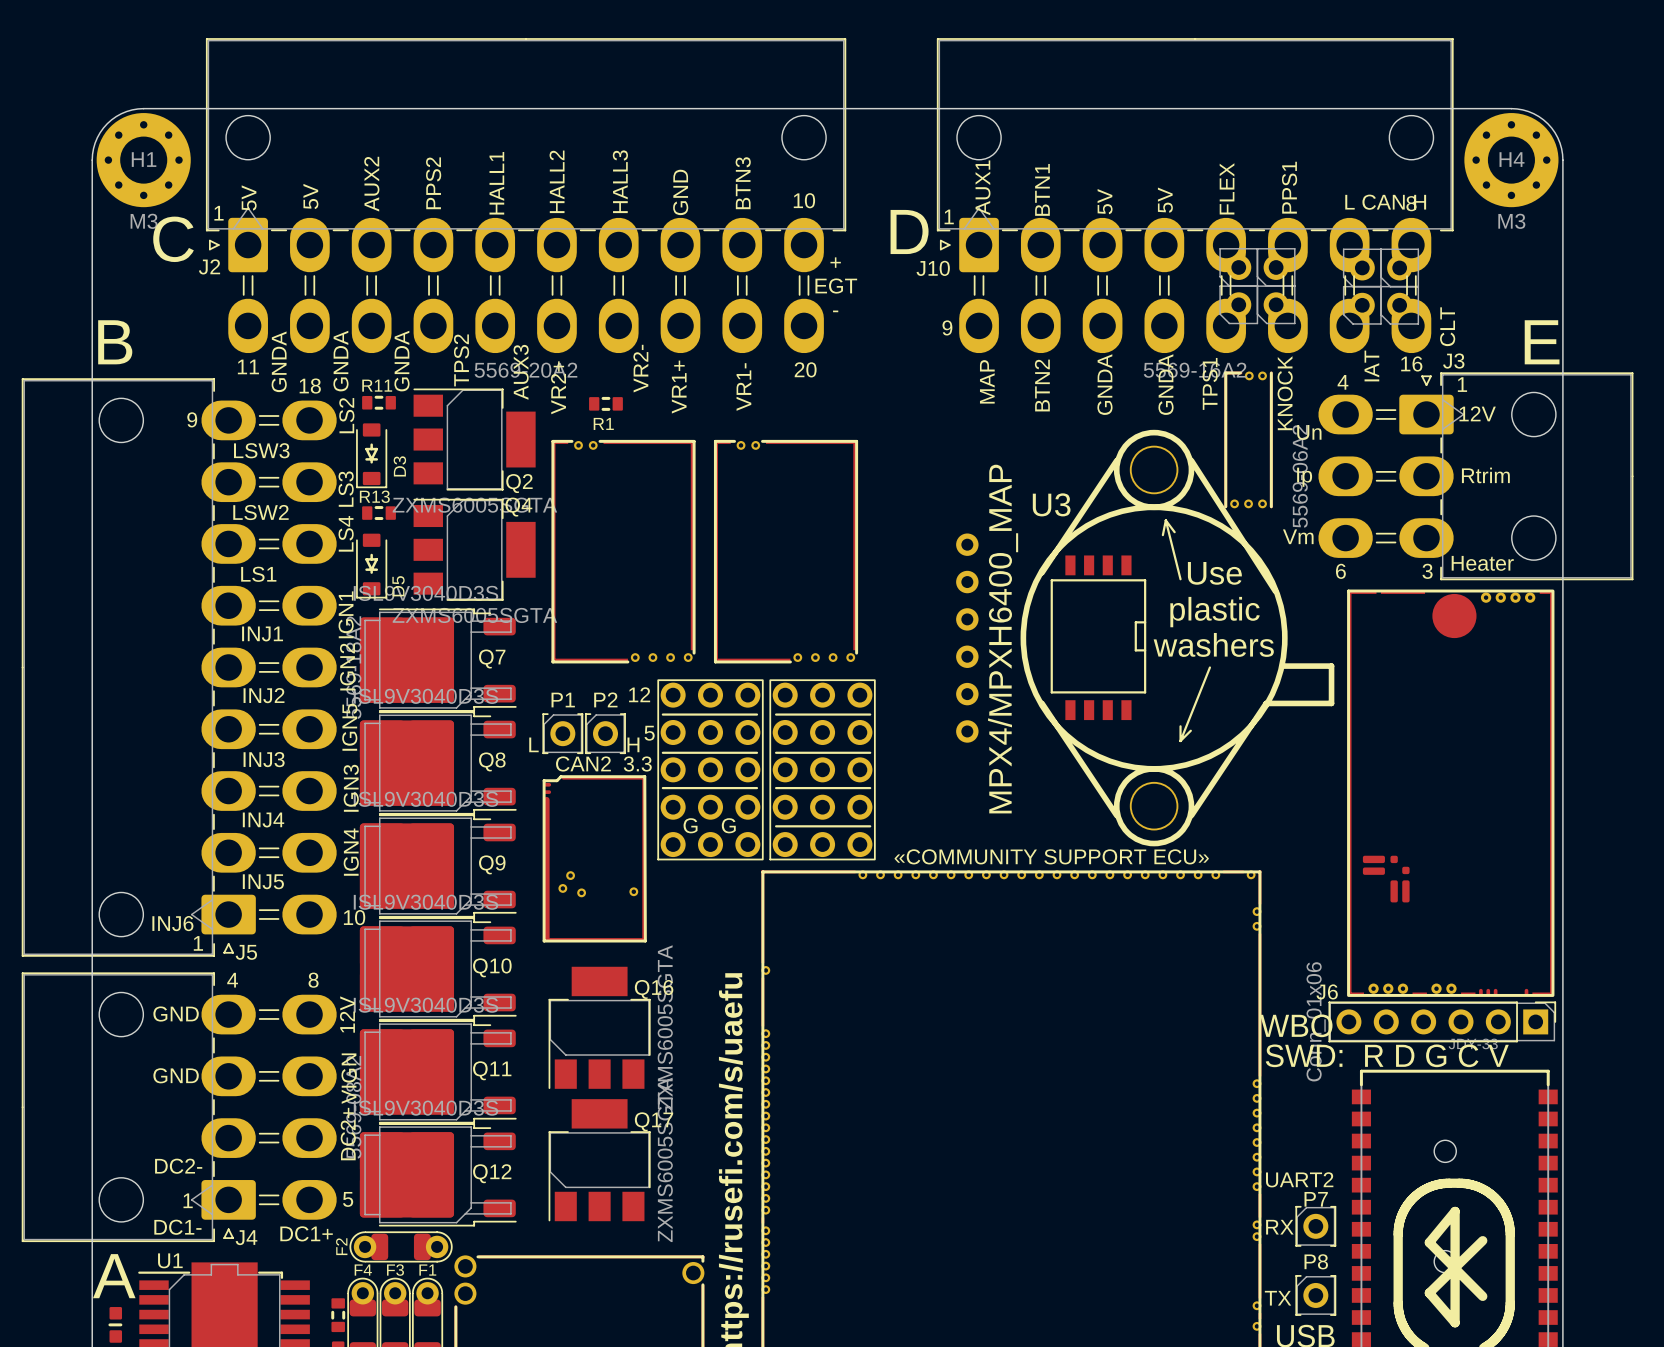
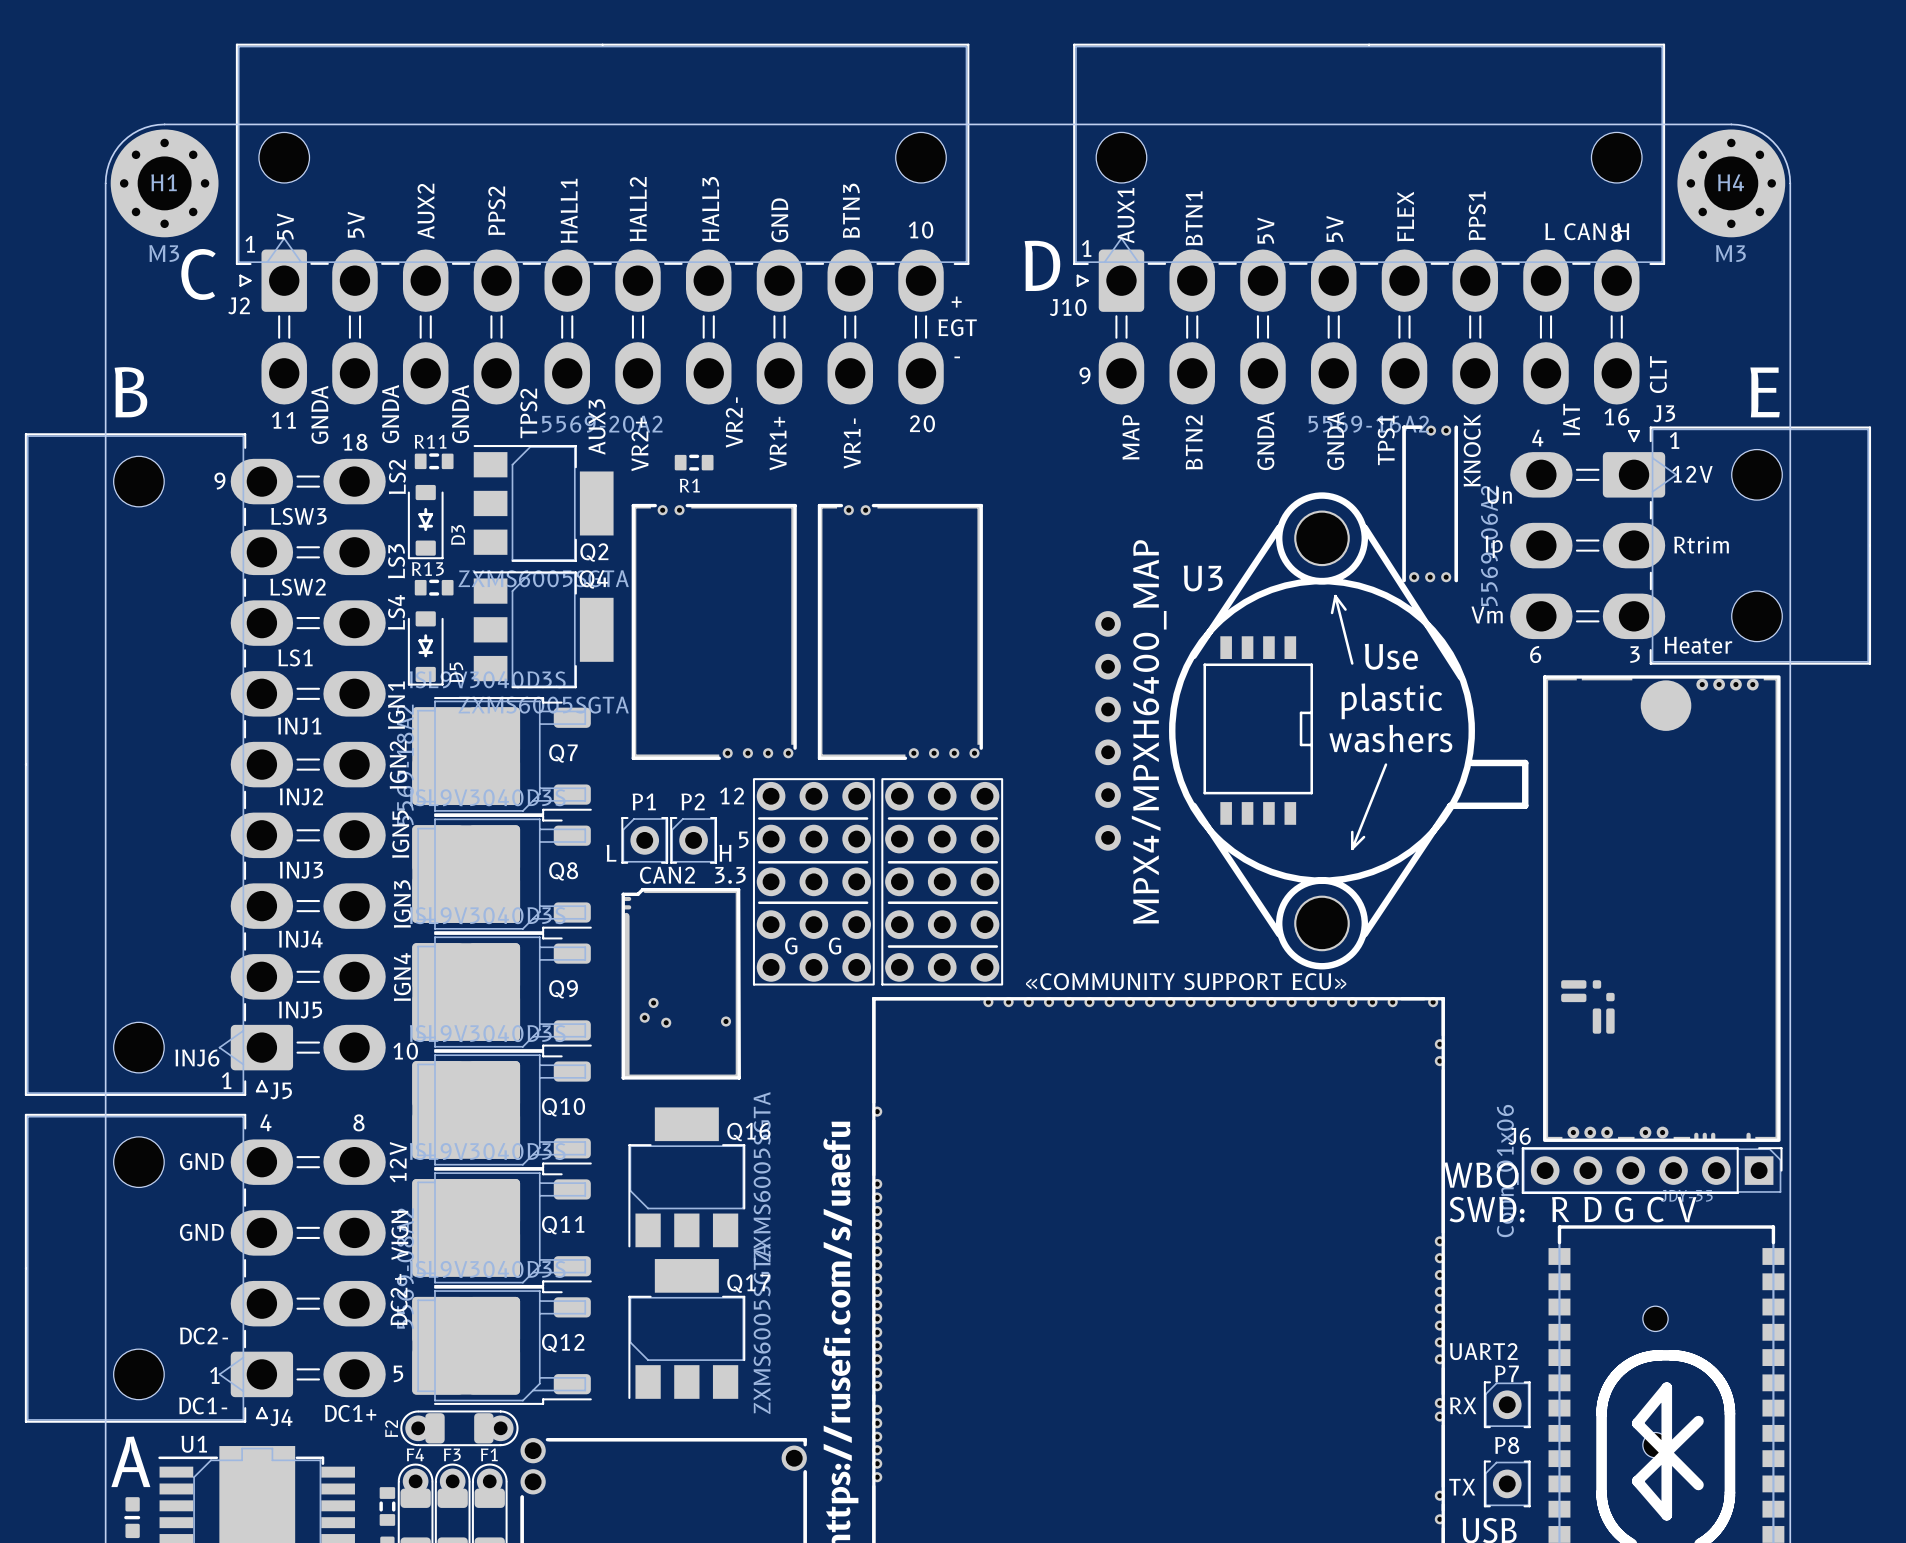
part: (1238, 267) -> none
part: (1276, 267) -> none
part: (1362, 267) -> none
part: (1399, 267) -> none
part: (1238, 304) -> none
part: (1276, 304) -> none
part: (1362, 305) -> none
part: (1399, 305) -> none

